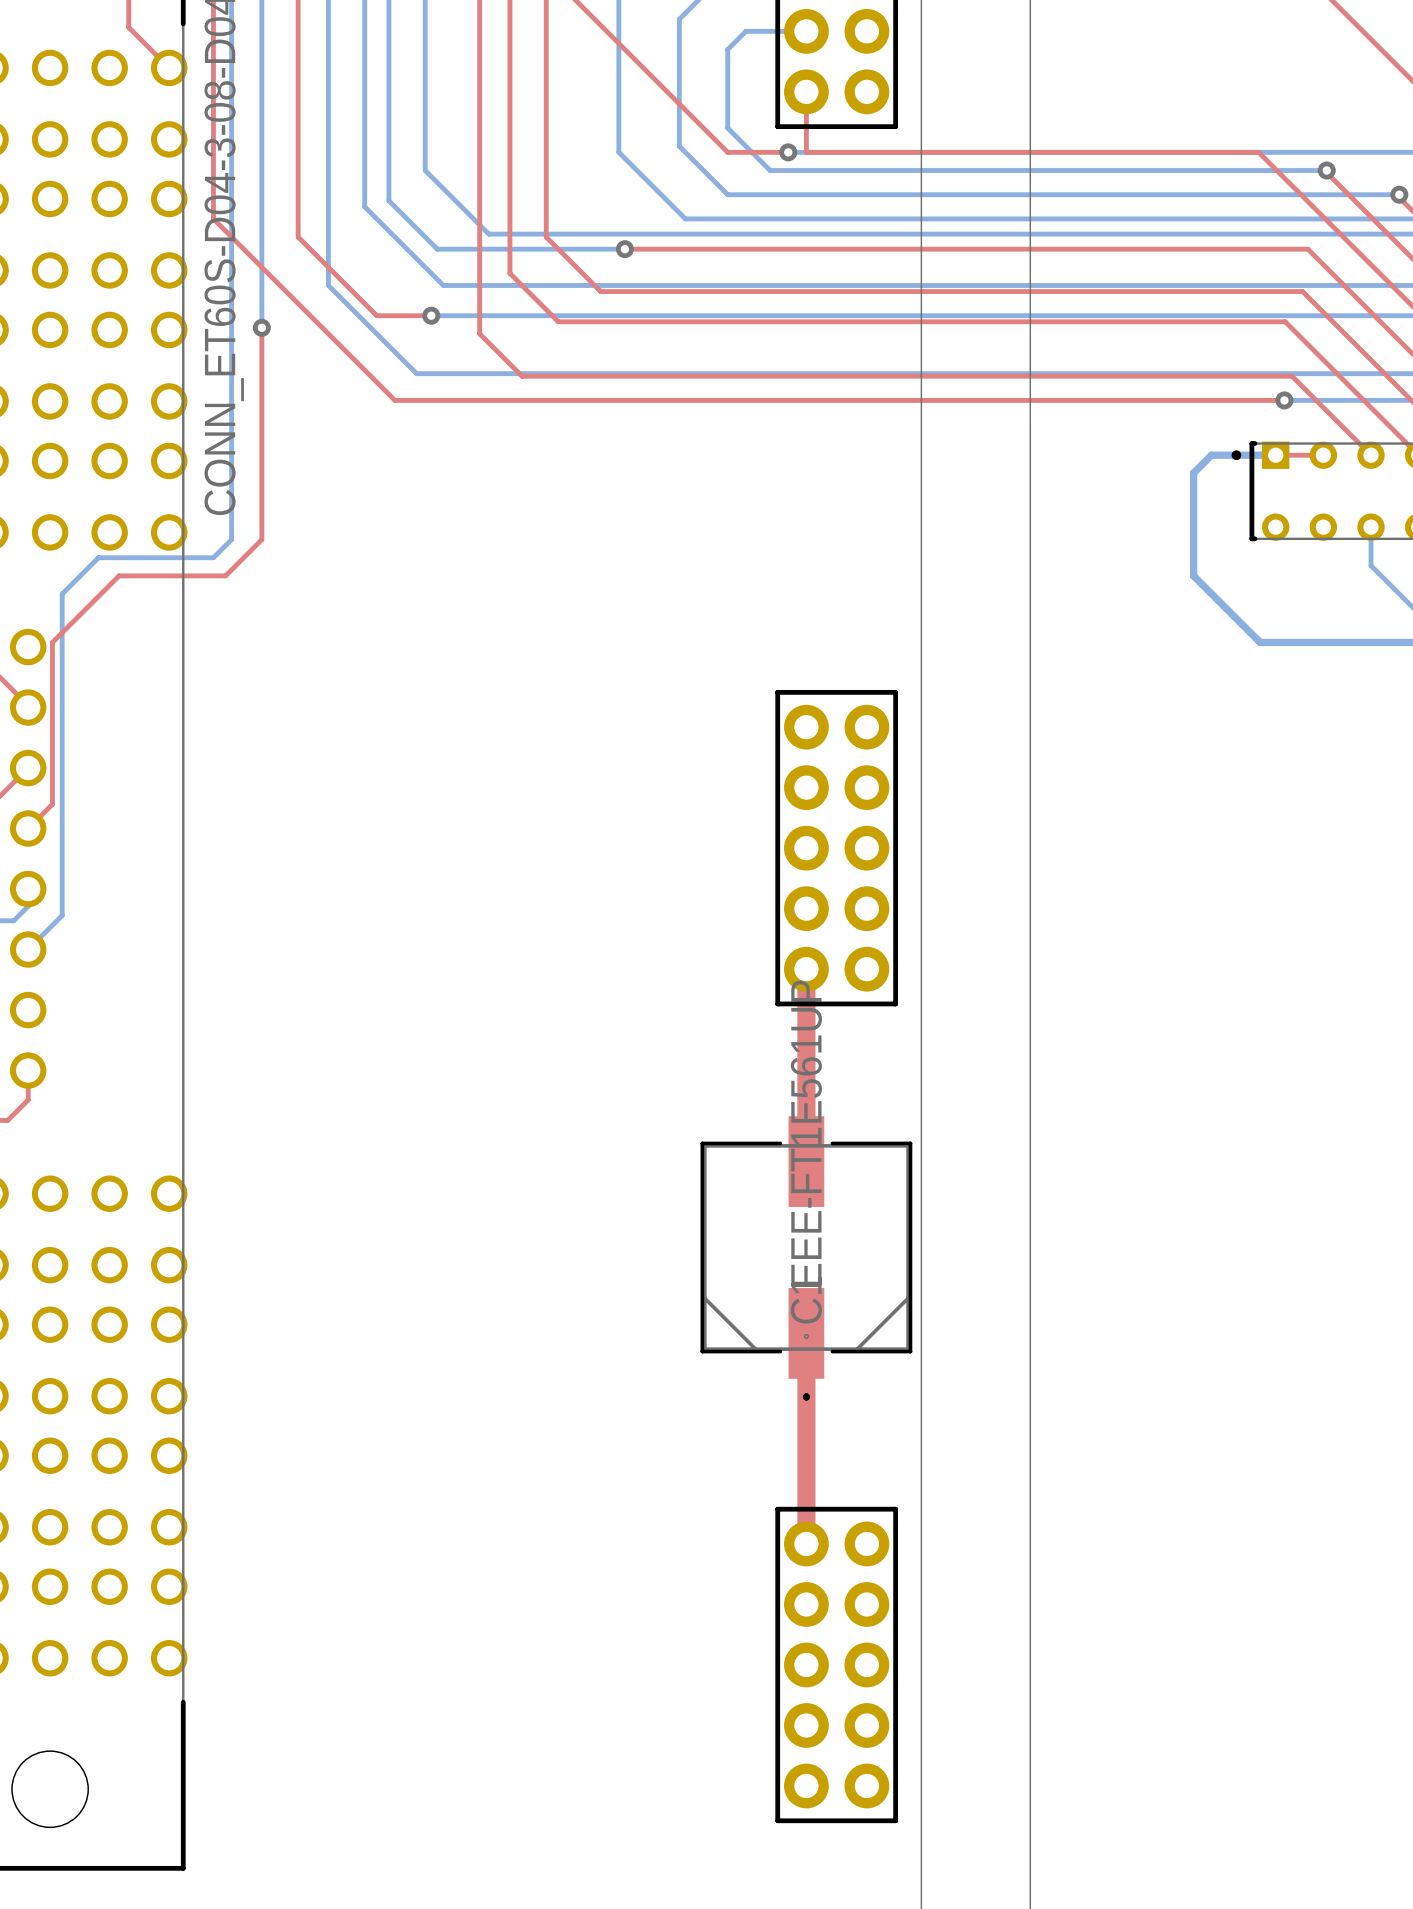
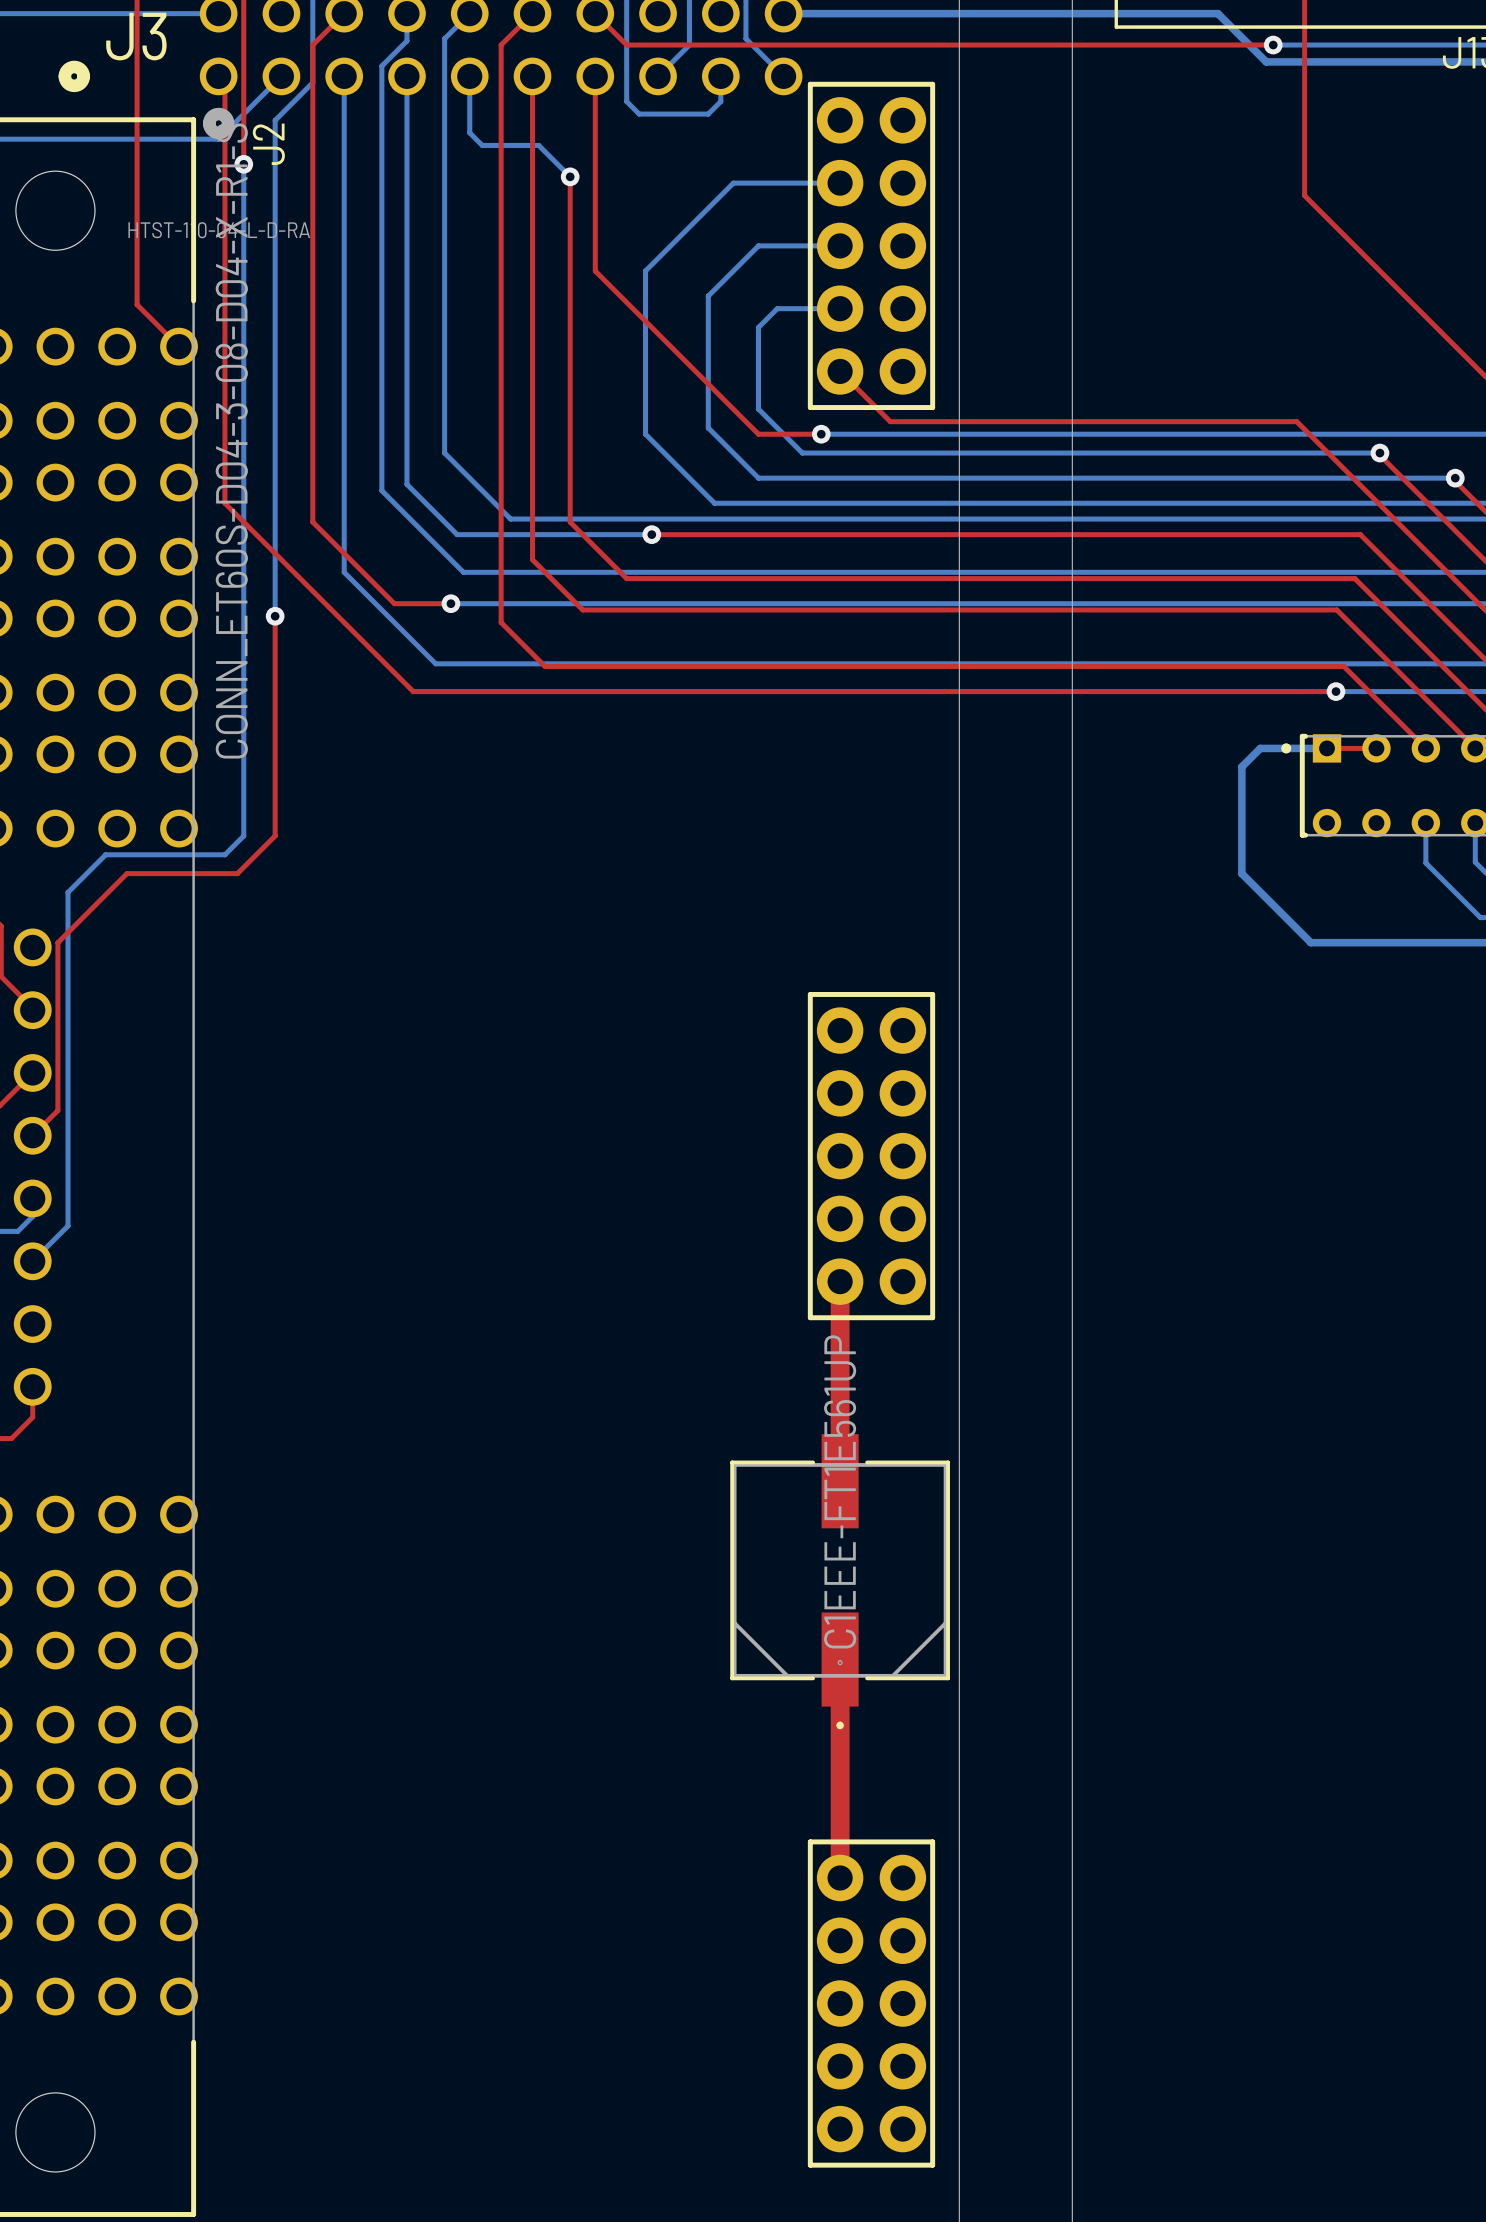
top track: (806, 91) (806, 152) (1258, 152) -> (840, 371) (890, 421) (1296, 421) (1309, 434)

